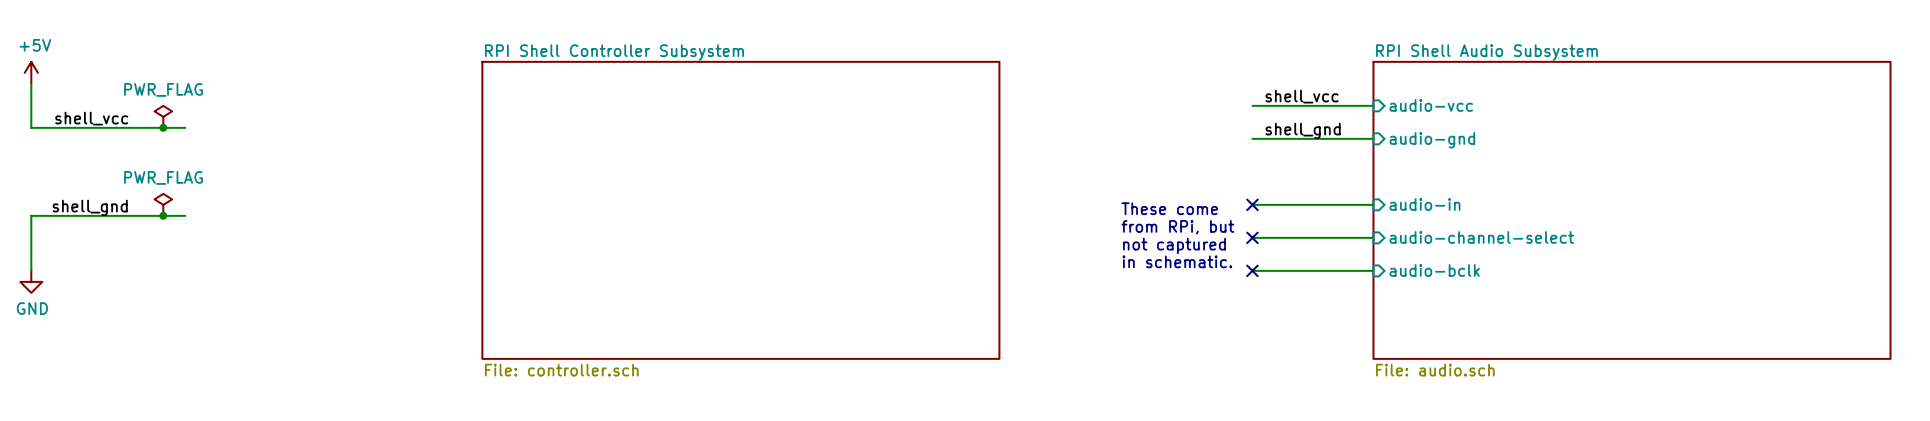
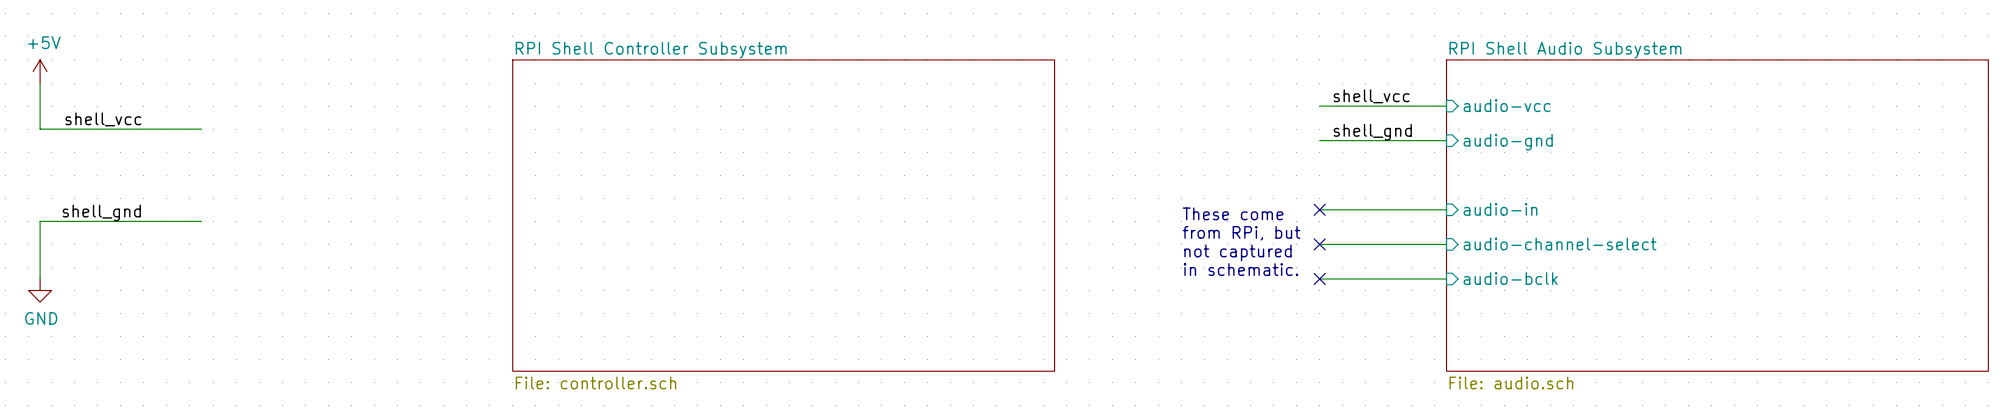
power symbol: PWR_FLAG (163, 116) -> none
junction: (163, 127) -> none
power symbol: PWR_FLAG (163, 204) -> none
junction: (163, 215) -> none

